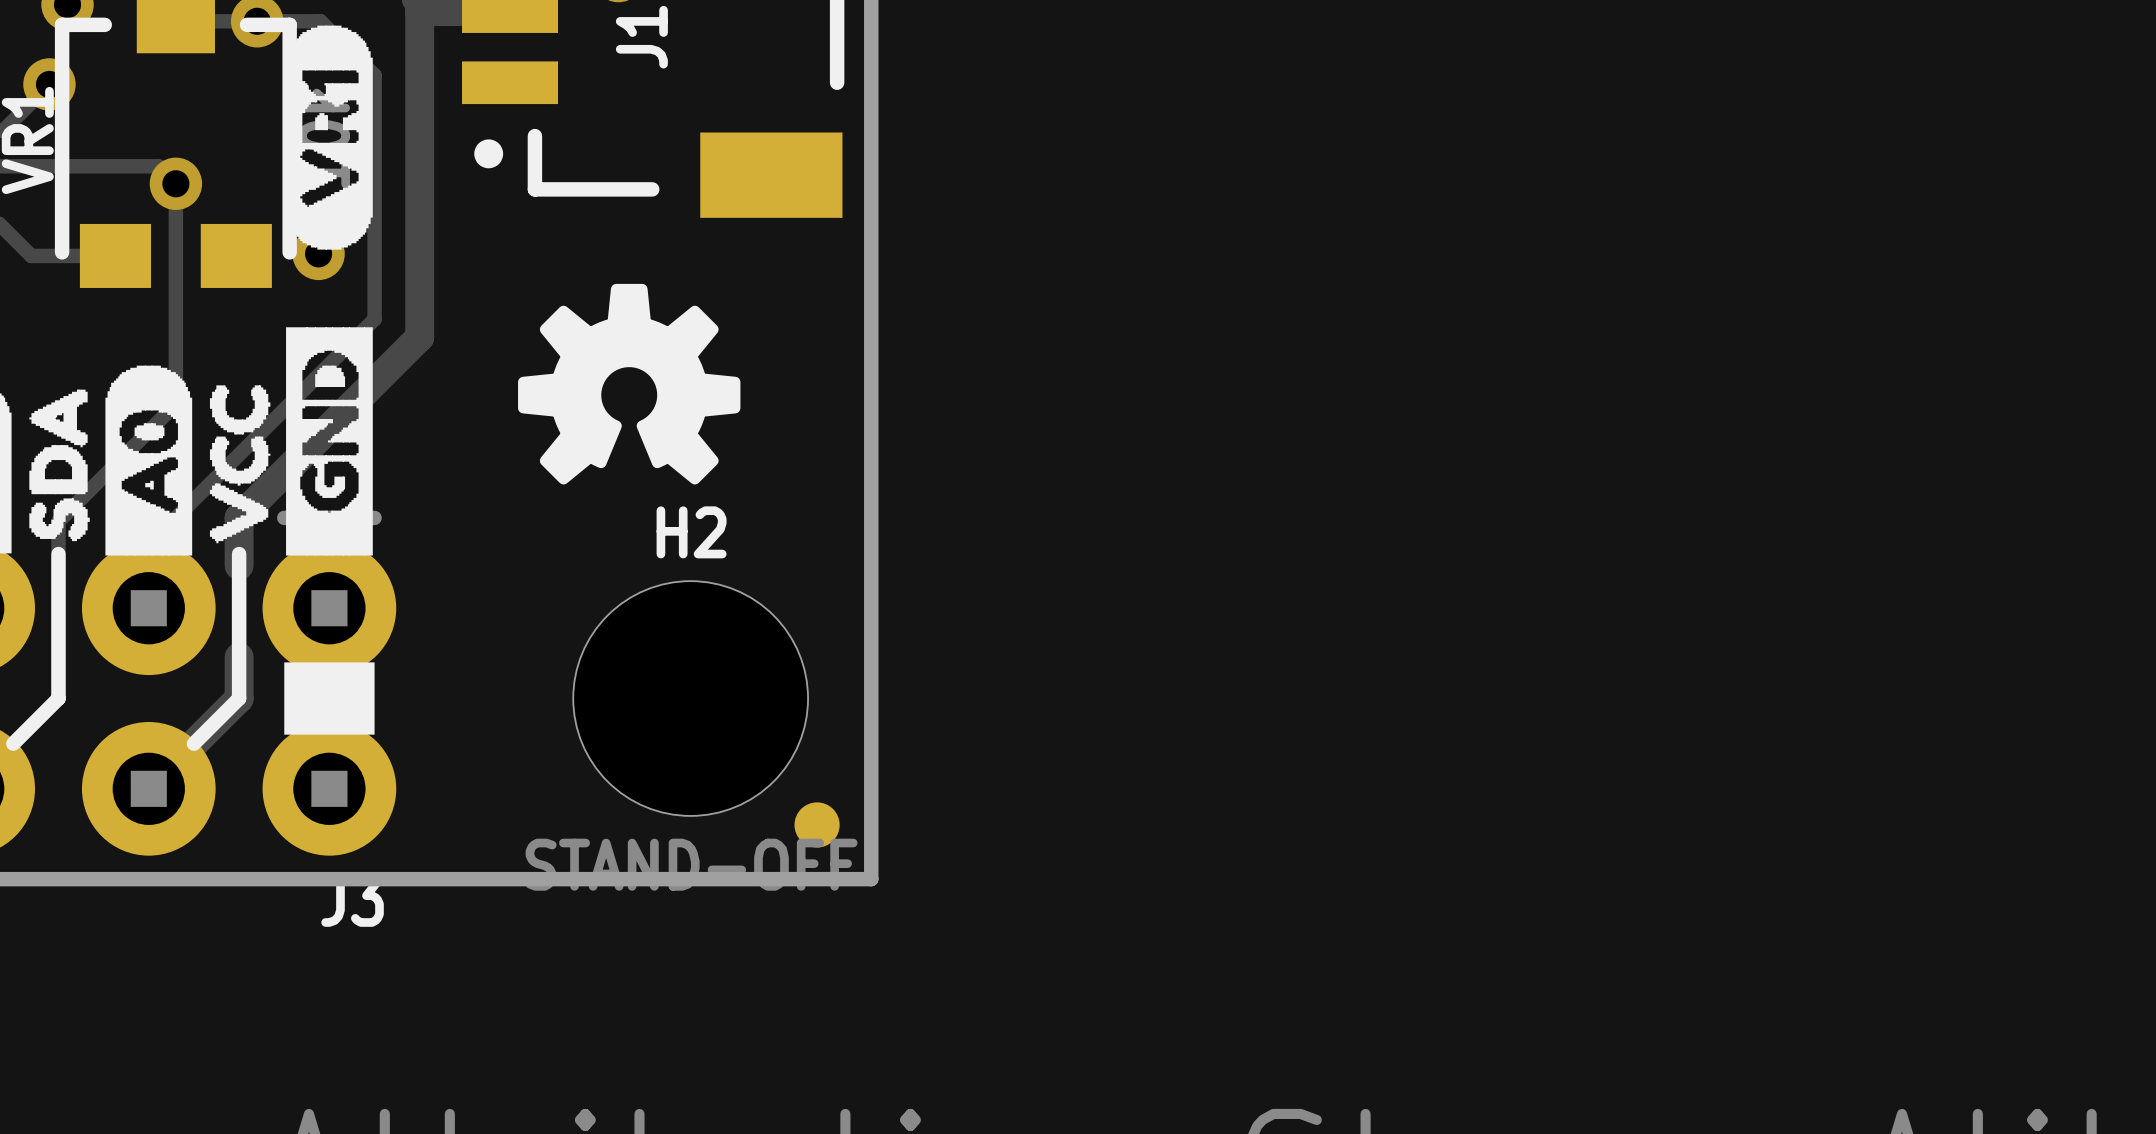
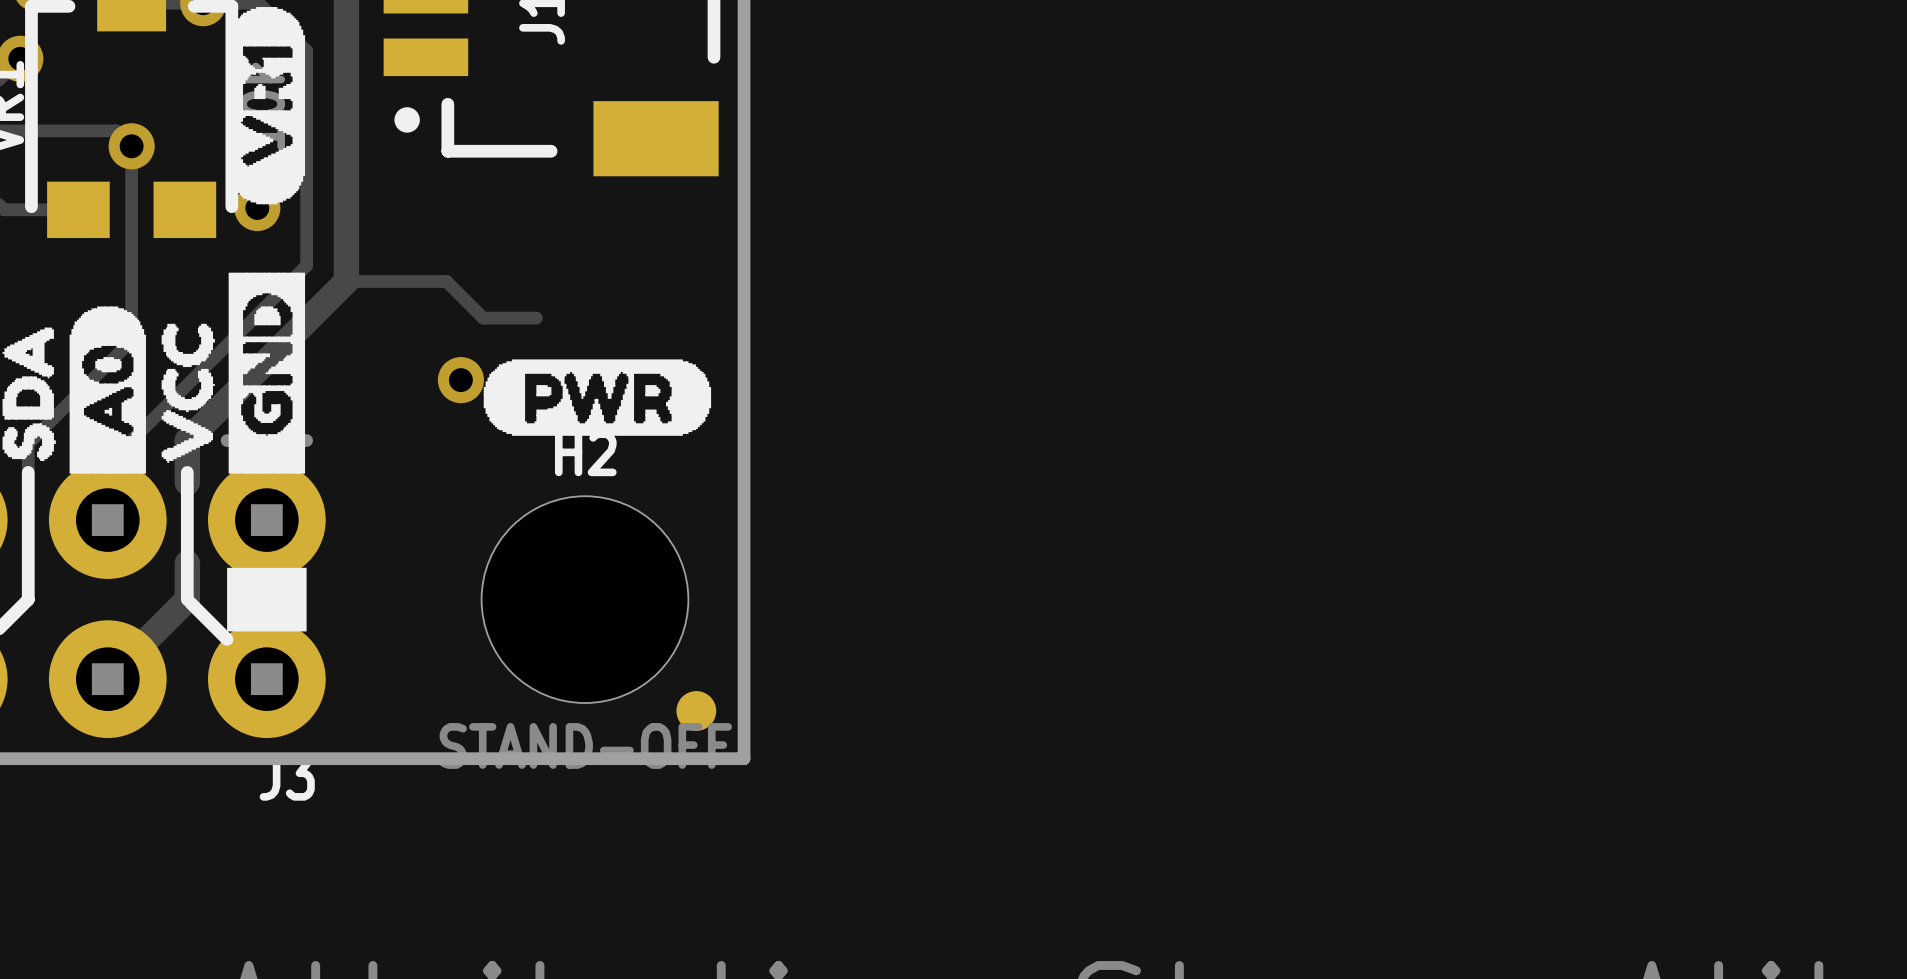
drawing: [518, 283, 741, 485] -> none
track: none -> (346, 281) (446, 281) (483, 318) (536, 318)
drawing: none -> [483, 359, 712, 436]
via: none -> (460, 380)
line: (239, 698) (193, 743) -> none
line: none -> (190, 602) (227, 639)

